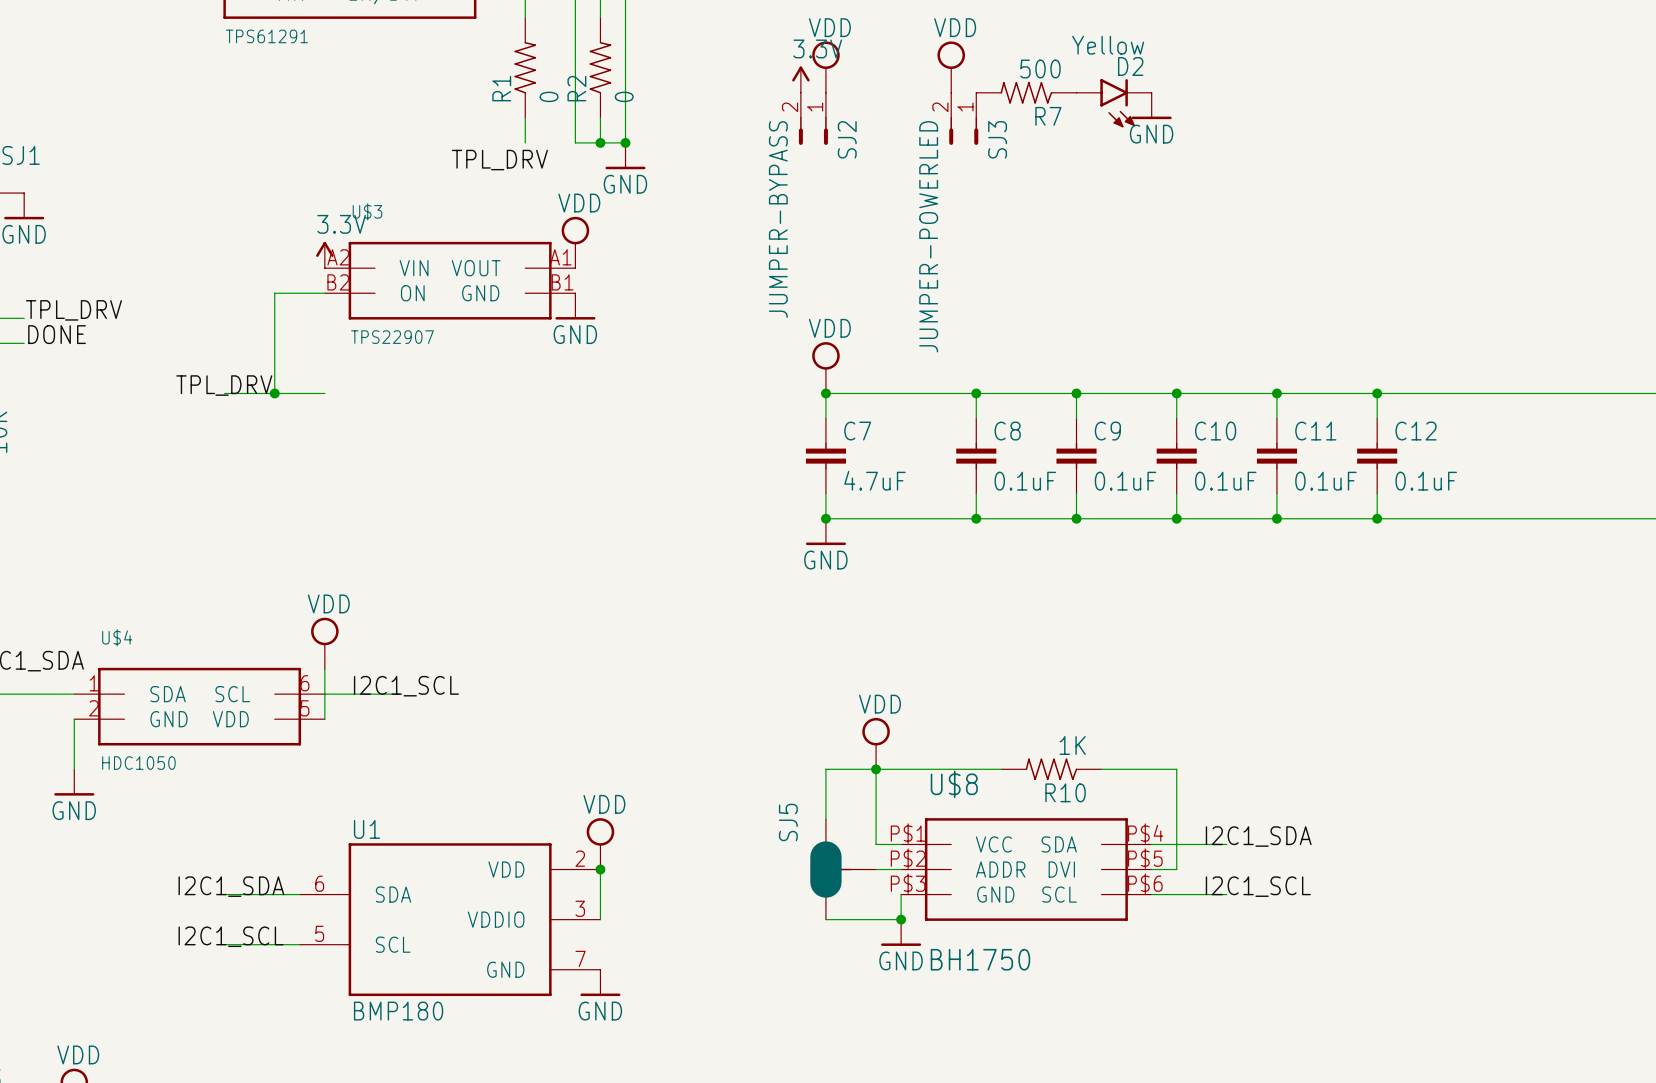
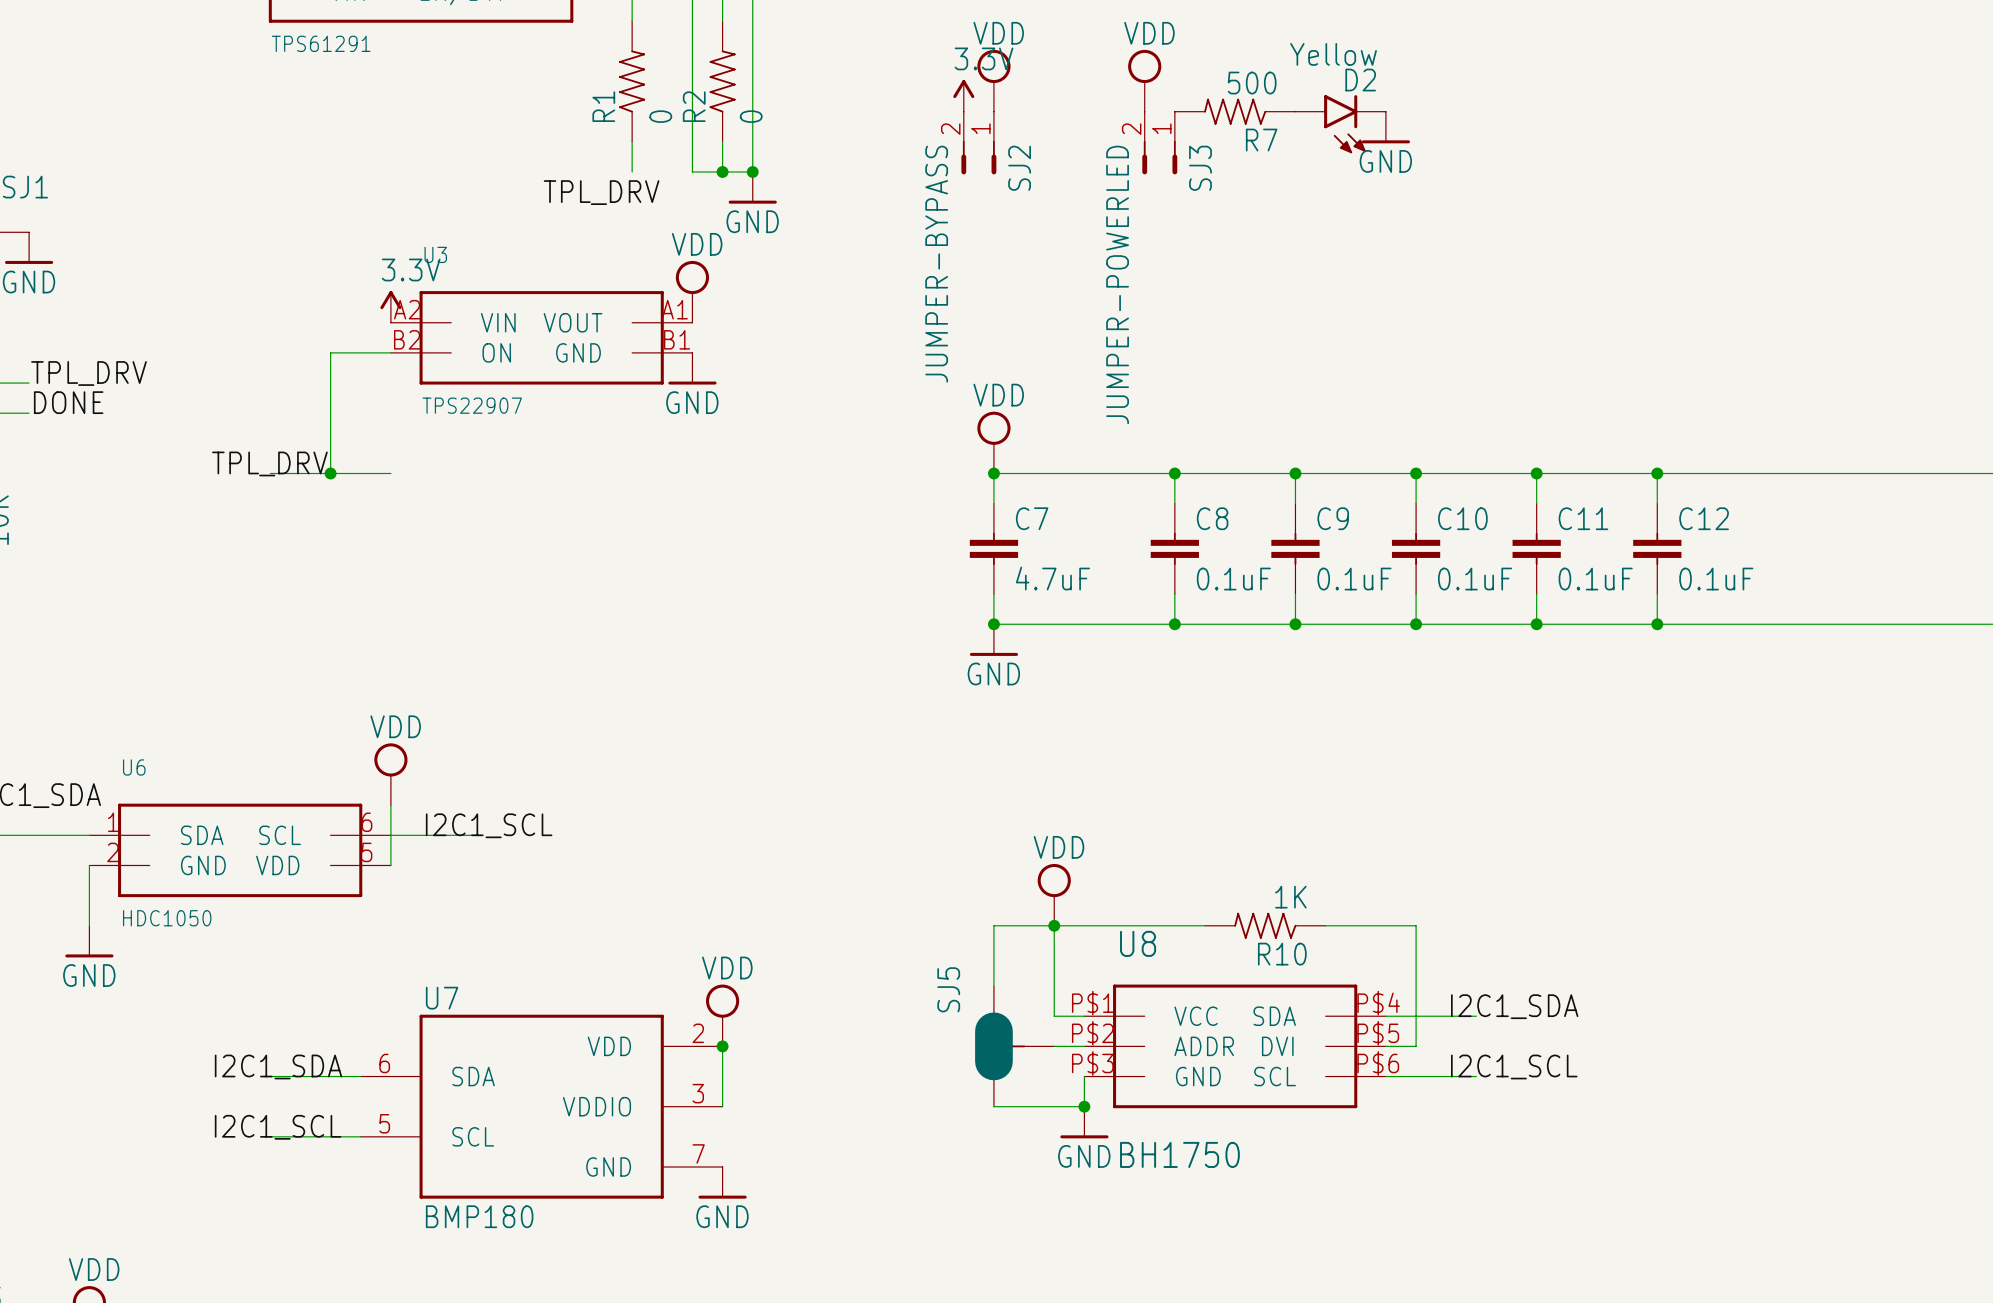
U$3 name: U$3 (367, 211) -> U3 (435, 254)
U$4 name: U$4 (117, 637) -> U6 (134, 767)
U$8 name: U$8 (954, 784) -> U8 (1138, 943)
U1 name: U1 (366, 829) -> U7 (442, 998)

